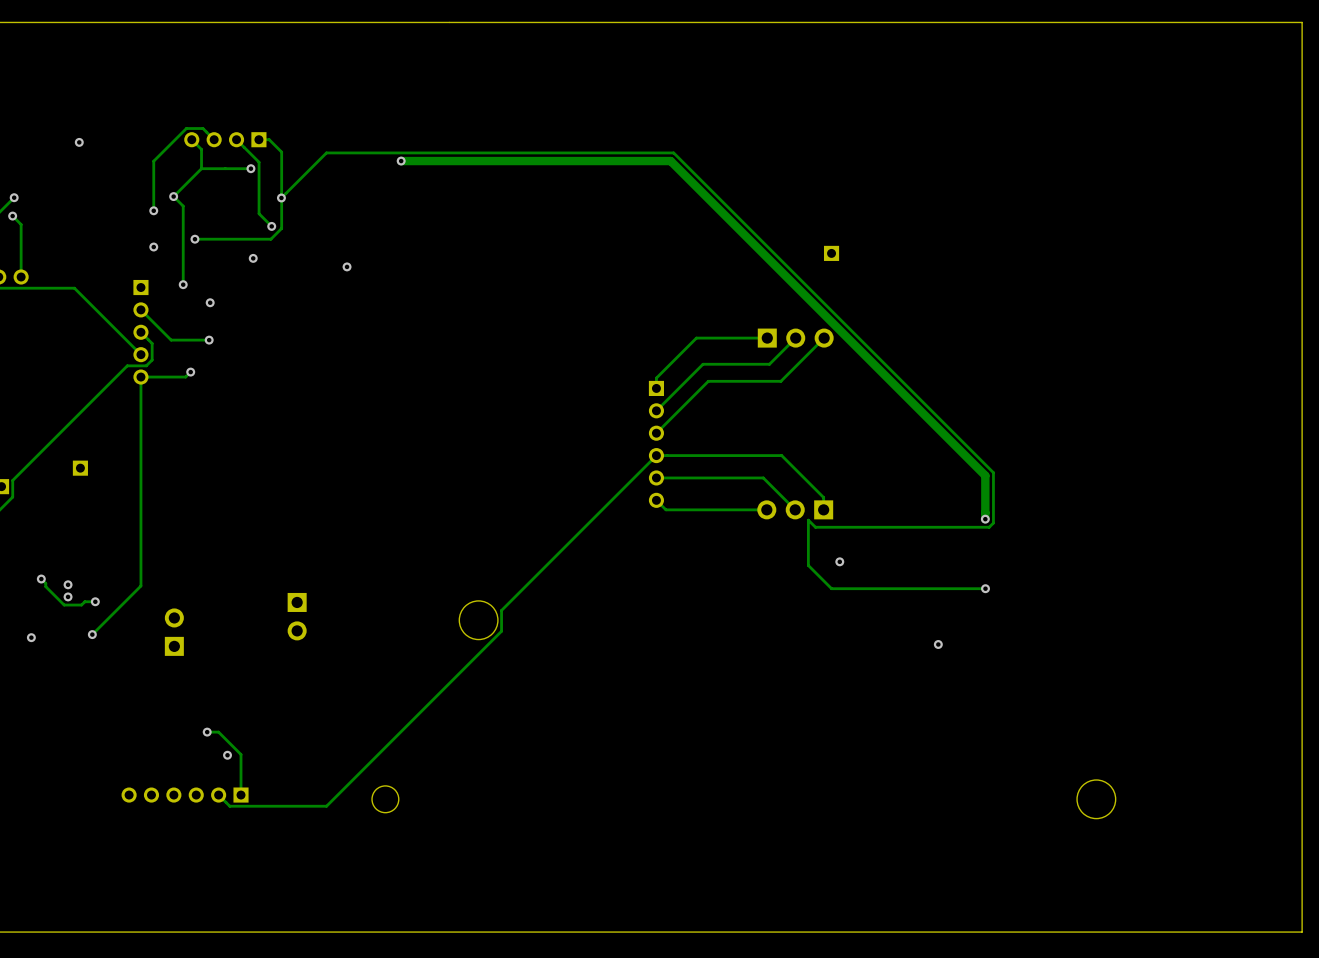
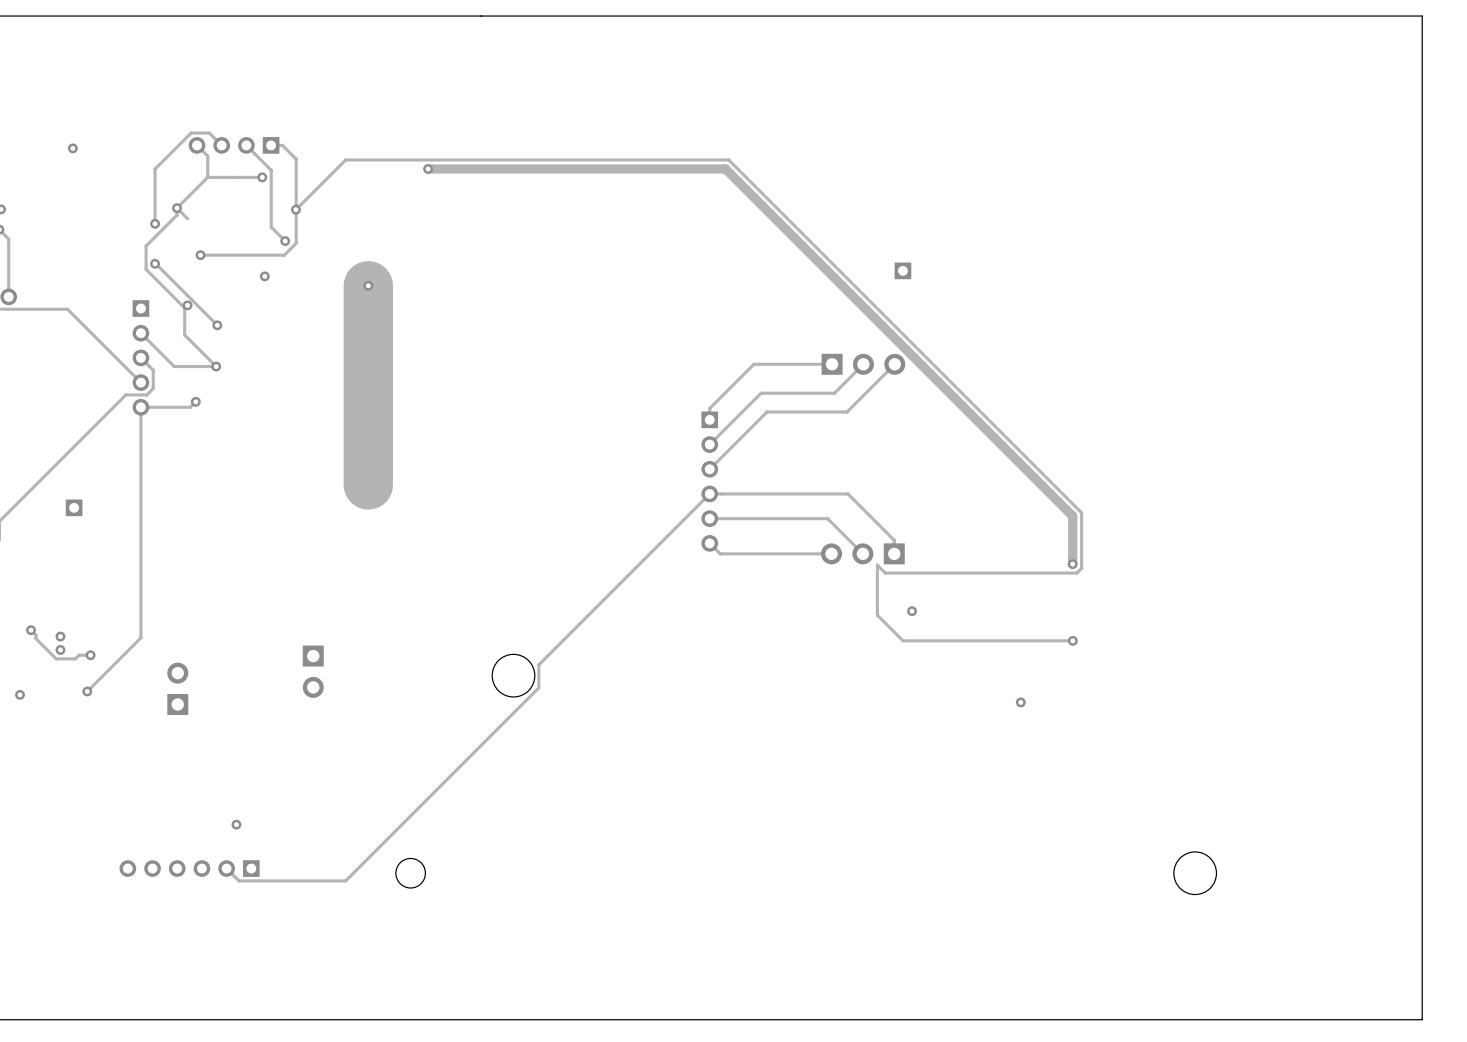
track: none -> (177, 208) (177, 215) (146, 246) (146, 269) (184, 308) (184, 335) (216, 366)
track: (183, 206) (183, 284) -> none
track: none -> (155, 263) (217, 325)
track: none -> (368, 285) (368, 484)
track: (207, 732) (218, 732) (241, 754) (241, 795) -> none
via: (207, 732) -> none

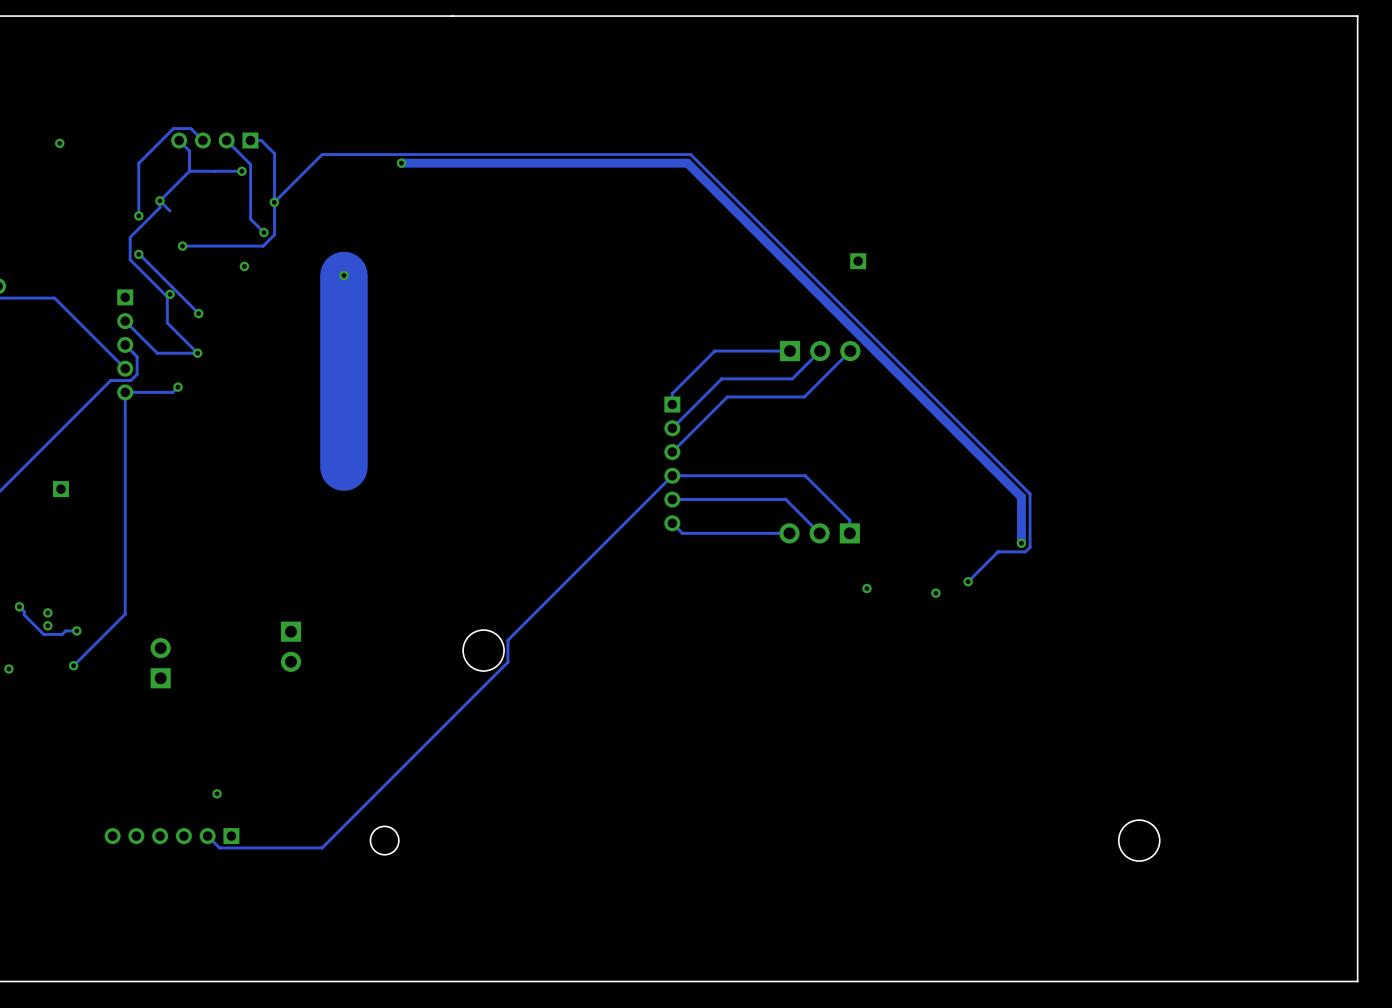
track: (1048, 573) (885, 573) (877, 565) (877, 615) (903, 640) (1072, 640) -> (998, 551) (968, 581)
via: none -> (968, 581)
via: none -> (935, 593)
via: (1072, 640) -> none
via: (1020, 702) -> none

